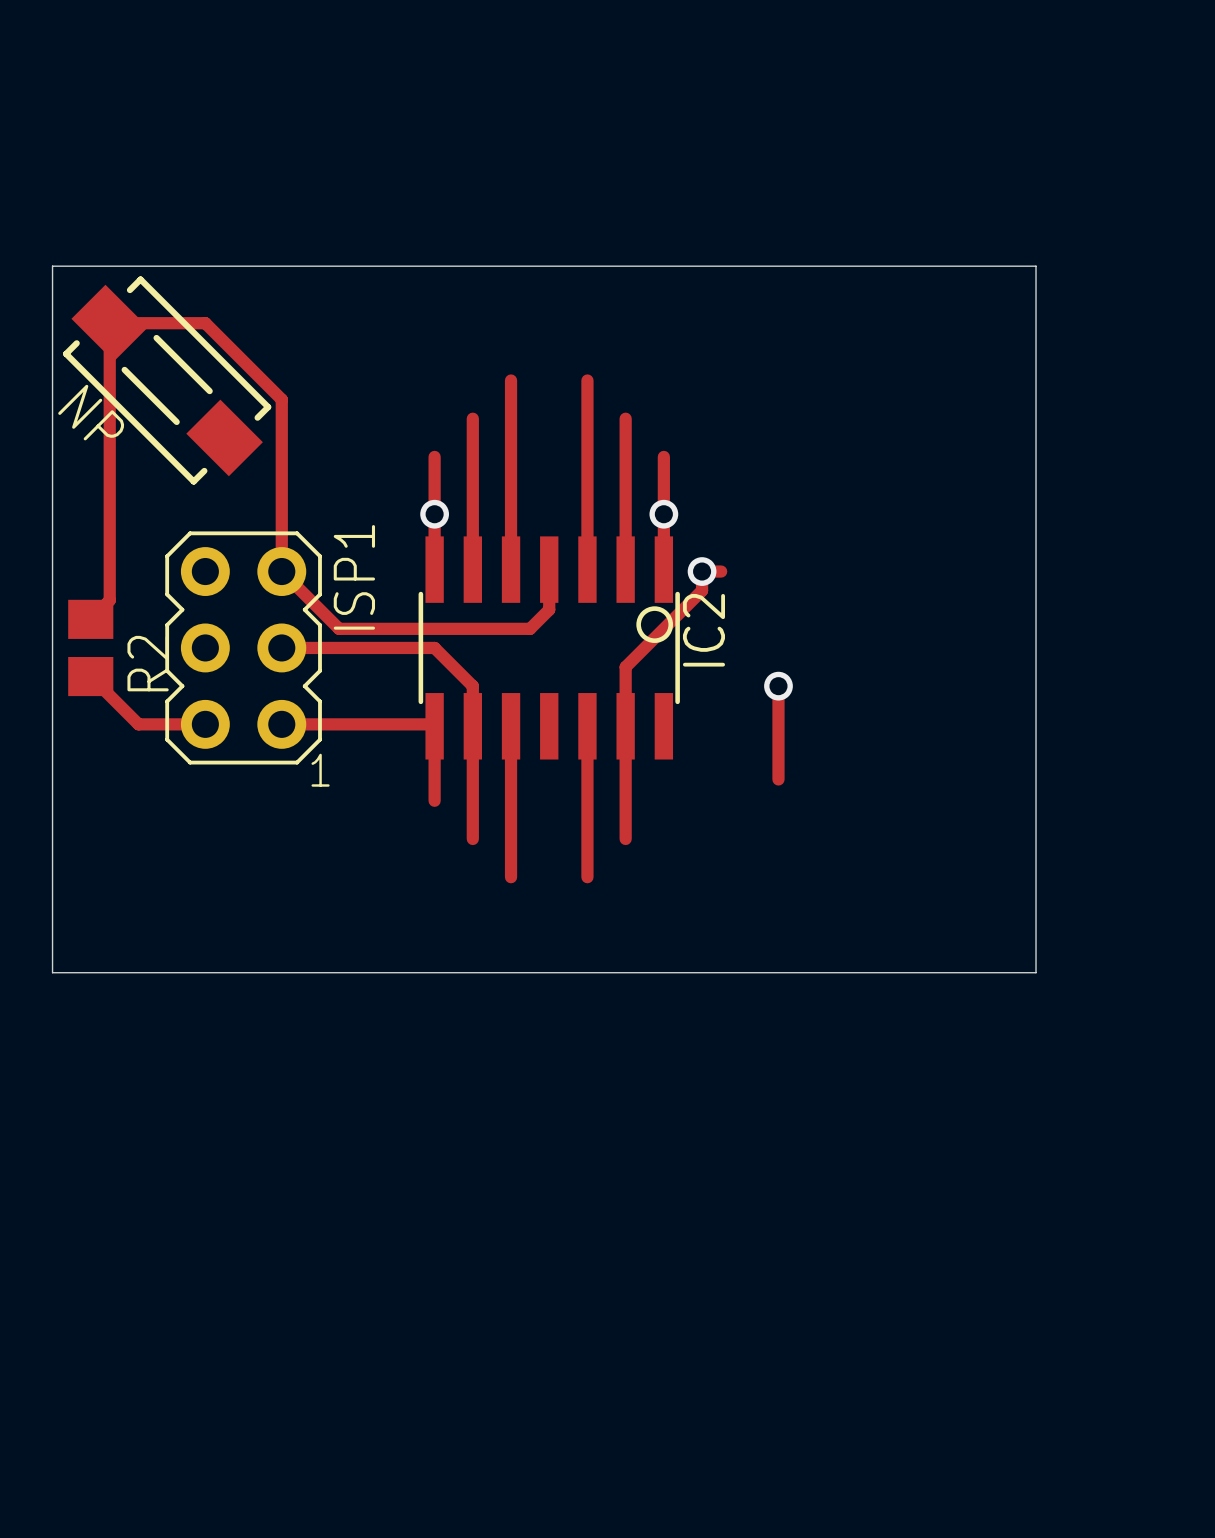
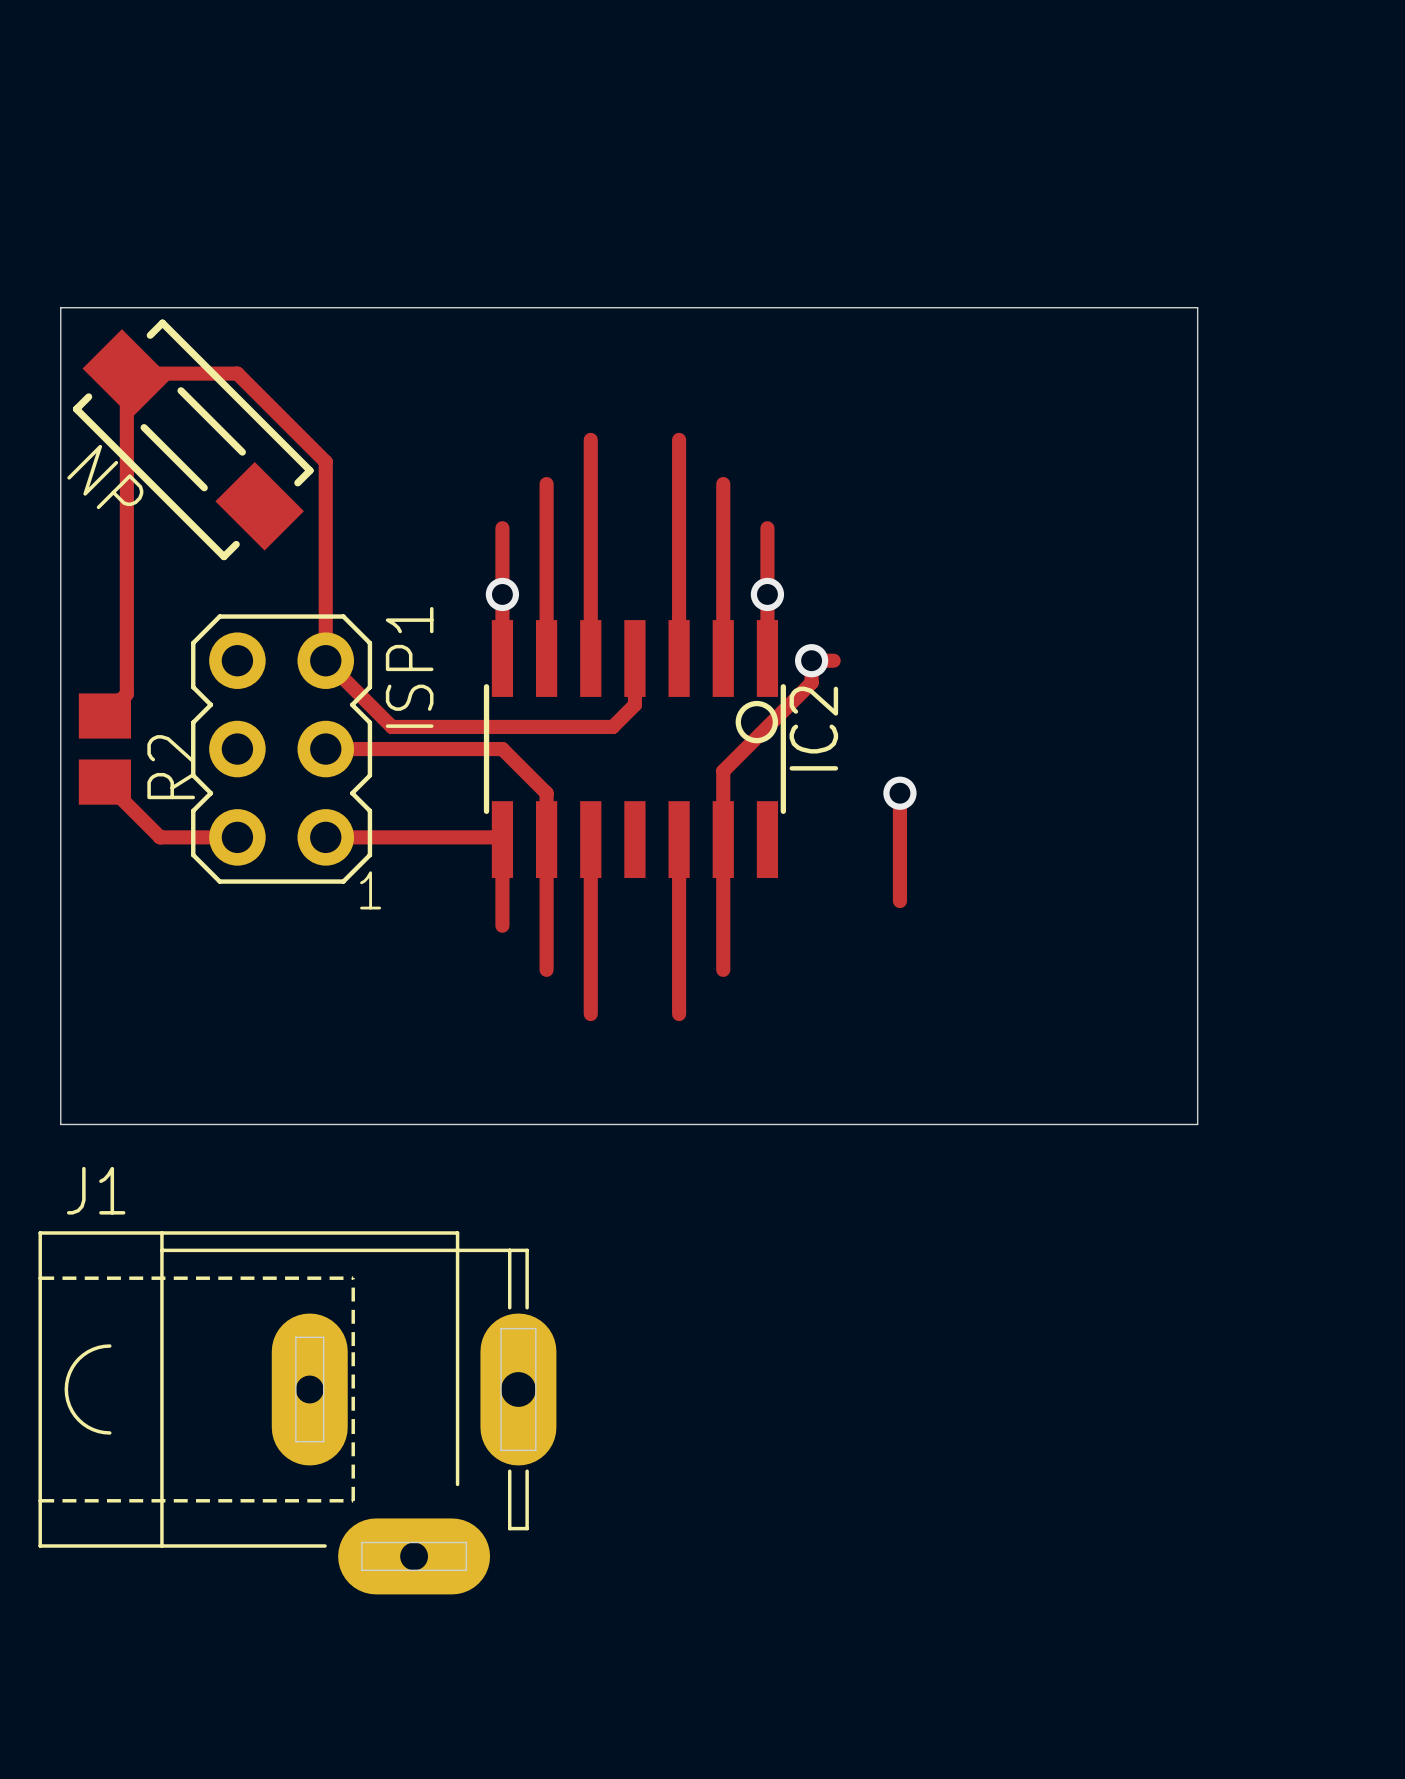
J1: none -> (297, 1412)

